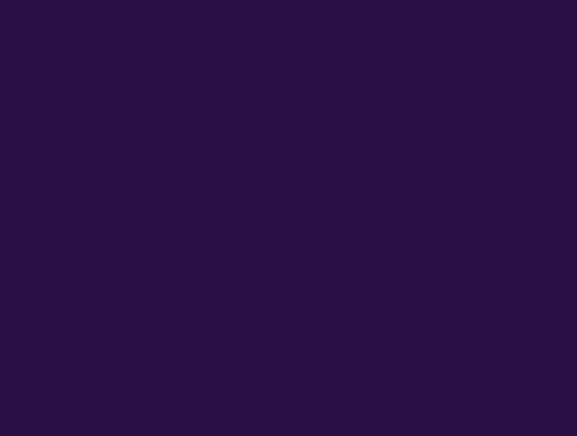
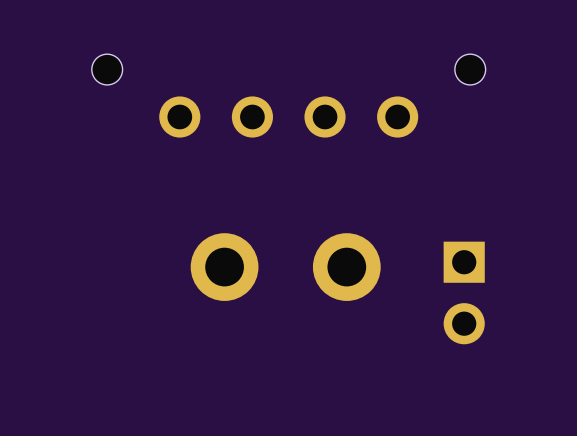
part: none -> (288, 95)
part: none -> (224, 267)
part: none -> (346, 267)
part: none -> (464, 292)

